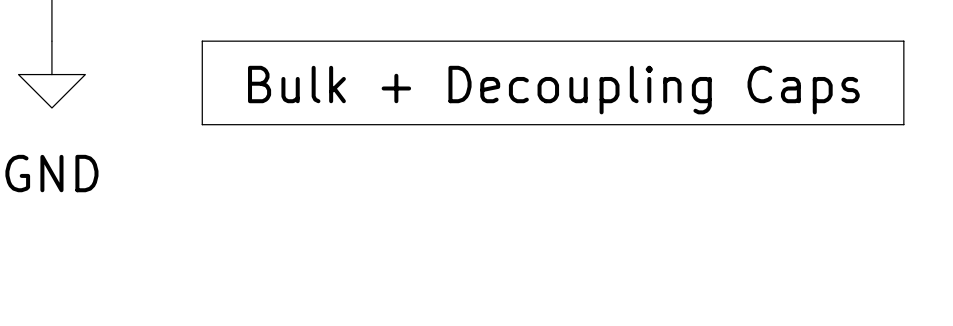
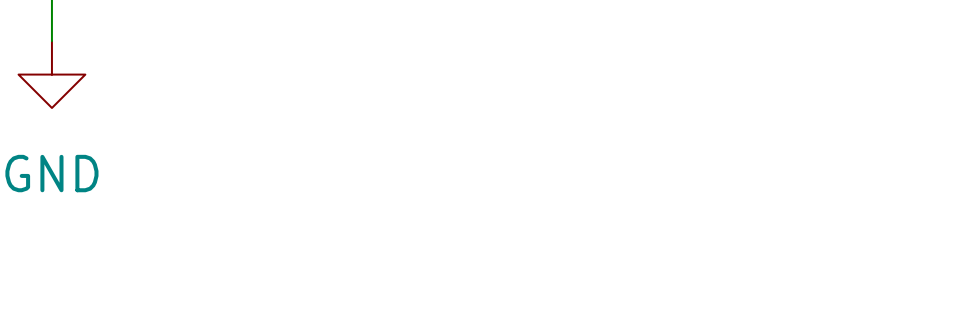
line: (202, 41) (903, 41) (903, 124) (202, 124) (202, 41) -> none
text: Bulk + Decoupling Caps (553, 90) -> none

